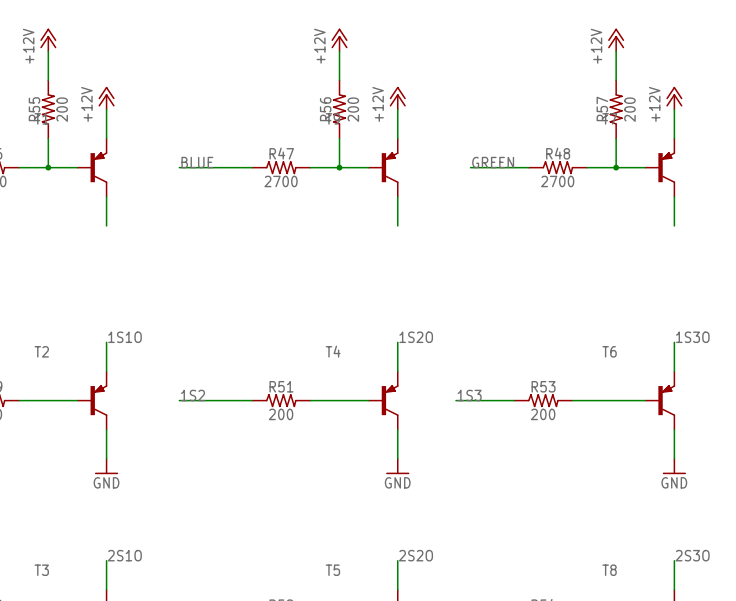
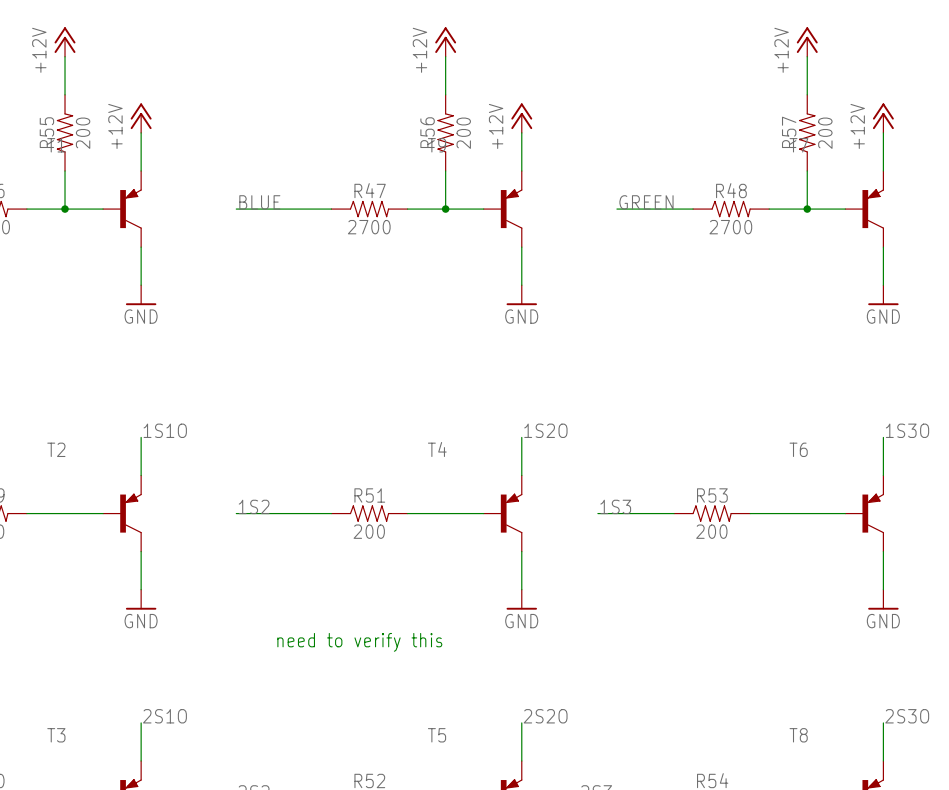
power symbol: none -> GND (141, 295)
power symbol: none -> GND (521, 295)
power symbol: none -> GND (883, 295)
text: none -> need to verify this (359, 642)

